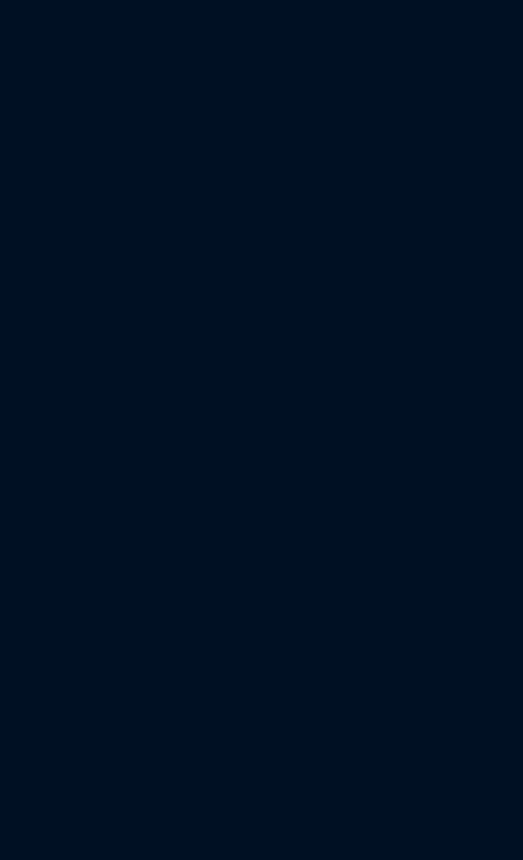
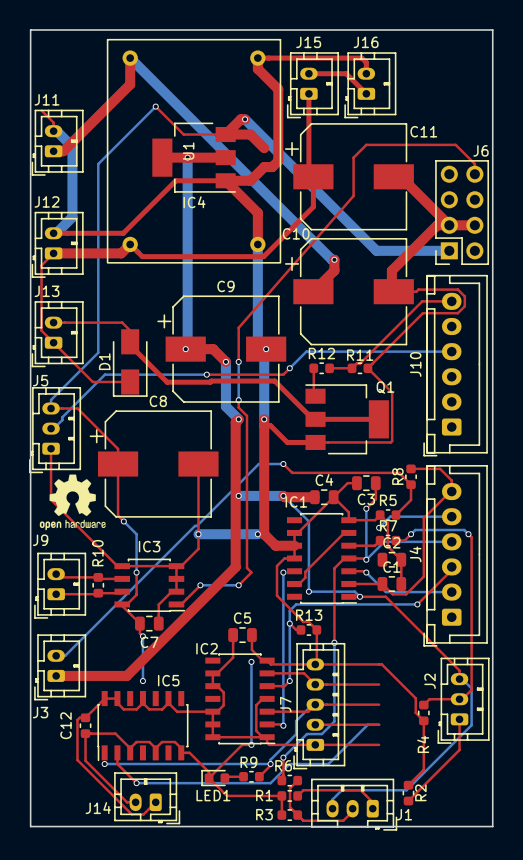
board edge: none -> (30, 29) (492, 29) (492, 826) (30, 826) (30, 29)
top track: none -> (130, 58) (130, 84) (63, 151) (53, 151)
bottom track: none -> (130, 58) (331, 259) (334, 259)
top track: none -> (308, 73) (346, 73) (366, 93)
top track: none -> (366, 73) (366, 62) (361, 58) (257, 58) (257, 68) (278, 89) (278, 161) (272, 167) (264, 167) (250, 180) (225, 180)
J15: none -> (312, 85)
J16: none -> (370, 85)
top track: none -> (308, 93) (308, 172) (313, 176) (313, 206) (263, 256) (142, 256) (130, 244) (121, 253) (53, 253) (41, 265) (41, 330) (92, 382) (130, 382)
top track: none -> (155, 106) (183, 134) (225, 134)
bottom track: none -> (155, 106) (98, 164) (98, 352) (51, 399) (51, 408)
via: none -> (155, 106)
top track: none -> (41, 110) (53, 122) (53, 131)
top track: none -> (245, 119) (240, 119) (225, 134)
bottom track: none -> (245, 119) (376, 250) (449, 250)
via: none -> (245, 119)
bottom track: none -> (53, 131) (56, 131) (72, 146) (72, 217) (56, 233) (53, 233)
top track: none -> (225, 134) (250, 134) (264, 148)
J11: none -> (57, 142)
U1: none -> (194, 151)
top track: none -> (162, 157) (225, 157)
bottom track: none -> (187, 157) (187, 347) (185, 349)
via: none -> (187, 157)
IC4: none -> (194, 157)
top track: none -> (474, 174) (474, 164) (455, 144) (366, 144) (353, 157) (353, 195) (238, 327) (238, 361)
C11: none -> (349, 176)
top track: none -> (393, 176) (400, 176) (449, 225)
top track: none -> (225, 180) (257, 212) (257, 244)
top track: none -> (225, 180) (175, 180) (123, 233) (53, 233)
J6: none -> (462, 212)
top track: none -> (474, 225) (437, 225) (391, 270) (391, 289) (393, 291) (457, 289) (464, 296) (464, 306) (457, 313) (422, 313) (367, 368) (392, 392) (390, 442) (287, 442) (270, 425) (264, 425)
J12: none -> (57, 244)
bottom track: none -> (257, 244) (257, 340) (266, 349) (264, 351) (264, 419)
top track: none -> (334, 259) (334, 270) (313, 291)
via: none -> (334, 259)
C10: none -> (349, 291)
top track: none -> (451, 301) (422, 301) (360, 363) (356, 363) (352, 368) (329, 368)
top track: none -> (53, 322) (122, 322) (130, 330) (130, 345) (167, 382) (274, 381) (313, 419) (378, 419)
J13: none -> (57, 334)
top track: none -> (185, 349) (213, 349) (225, 361)
via: none -> (185, 349)
C9: none -> (221, 349)
via: none -> (266, 349)
bottom track: none -> (451, 351) (306, 351) (289, 368)
bottom track: none -> (225, 361) (225, 406) (238, 419)
via: none -> (225, 361)
bottom track: none -> (238, 361) (238, 400)
via: none -> (238, 361)
D1: none -> (130, 362)
J10: none -> (455, 365)
top track: none -> (289, 368) (283, 374) (206, 374)
via: none -> (289, 368)
top track: none -> (313, 368) (313, 394) (315, 396)
R12: none -> (321, 368)
R11: none -> (359, 368)
bottom track: none -> (206, 374) (104, 374) (62, 417) (62, 420) (53, 428) (51, 428)
via: none -> (206, 374)
top track: none -> (238, 400) (238, 407) (246, 415) (246, 568) (251, 572) (238, 585)
via: none -> (238, 400)
top track: none -> (51, 408) (77, 408) (118, 448) (118, 515) (123, 521)
top track: none -> (238, 419) (235, 422) (235, 567) (126, 675) (56, 675)
via: none -> (238, 419)
top track: none -> (264, 419) (264, 534) (275, 545) (294, 545)
via: none -> (264, 419)
Q1: none -> (347, 419)
J5: none -> (55, 430)
top track: none -> (51, 448) (51, 499) (117, 566) (181, 566) (198, 548) (198, 464)
C8: none -> (154, 464)
top track: none -> (283, 464) (292, 472) (399, 472) (411, 484) (411, 500) (395, 515)
bottom track: none -> (283, 464) (258, 464) (65, 655) (56, 655)
via: none -> (283, 464)
top track: none -> (411, 468) (440, 468) (451, 480) (451, 491) (423, 518) (423, 576) (406, 594) (392, 594) (382, 584) (348, 584)
drawing: none -> [39, 474, 106, 531]
R8: none -> (411, 476)
top track: none -> (356, 483) (347, 483) (297, 532) (294, 532) (294, 558) (284, 558) (277, 565) (277, 595) (303, 621) (308, 621) (316, 629) (315, 664)
C3: none -> (366, 483)
top track: none -> (375, 483) (375, 499) (366, 508)
bottom track: none -> (238, 495) (283, 495) (308, 521) (308, 591) (354, 591) (359, 596)
via: none -> (238, 495)
top track: none -> (283, 495) (314, 497)
via: none -> (283, 495)
C4: none -> (324, 497)
top track: none -> (333, 497) (348, 512) (348, 520) (375, 520) (380, 515) (387, 522) (387, 546) (401, 559) (401, 584)
bottom track: none -> (366, 508) (366, 559) (384, 541) (451, 541)
via: none -> (366, 508)
R5: none -> (388, 515)
bottom track: none -> (451, 516) (390, 516) (379, 527)
bottom track: none -> (123, 521) (136, 534) (136, 572)
via: none -> (123, 521)
via: none -> (379, 527)
top track: none -> (348, 532) (344, 532) (305, 571) (305, 577) (299, 584) (294, 584)
bottom track: none -> (198, 534) (257, 534)
via: none -> (198, 534)
via: none -> (257, 534)
top track: none -> (411, 534) (404, 540) (395, 540)
bottom track: none -> (411, 534) (415, 530) (464, 530) (468, 534)
via: none -> (411, 534)
top track: none -> (468, 534) (471, 537) (471, 689) (462, 699) (429, 699) (423, 705)
via: none -> (468, 534)
top track: none -> (380, 540) (375, 545) (348, 545)
R7: none -> (388, 540)
J4: none -> (455, 555)
IC1: none -> (322, 558)
top track: none -> (366, 559) (344, 558) (334, 568) (334, 642)
via: none -> (366, 559)
C2: none -> (391, 559)
top track: none -> (176, 566) (176, 591) (171, 591) (158, 604) (158, 623)
top track: none -> (451, 566) (451, 570) (417, 604)
top track: none -> (348, 571) (366, 572)
top track: none -> (136, 572) (136, 594) (126, 604) (122, 605) (139, 623) (139, 633) (142, 636)
via: none -> (136, 572)
bottom track: none -> (283, 572) (283, 725)
via: none -> (283, 572)
bottom track: none -> (366, 572) (385, 592) (451, 592)
via: none -> (366, 572)
top track: none -> (56, 574) (59, 577) (122, 578)
C1: none -> (391, 584)
J9: none -> (60, 585)
R10: none -> (98, 585)
IC3: none -> (149, 585)
top track: none -> (200, 585) (181, 604) (176, 604)
bottom track: none -> (200, 585) (238, 585)
via: none -> (200, 585)
via: none -> (238, 585)
top track: none -> (122, 591) (97, 594) (56, 594)
via: none -> (308, 591)
top track: none -> (348, 596) (385, 596) (459, 670) (459, 679)
via: none -> (359, 596)
bottom track: none -> (417, 604) (296, 604) (289, 610) (289, 681)
via: none -> (417, 604)
C7: none -> (149, 623)
top track: none -> (289, 623) (296, 629) (301, 629)
via: none -> (289, 623)
R13: none -> (308, 629)
top track: none -> (233, 635) (233, 657) (217, 673) (212, 673) (212, 686) (217, 686) (223, 692) (223, 705) (217, 711) (177, 711) (168, 703)
C5: none -> (242, 635)
top track: none -> (251, 635) (251, 649) (262, 660) (267, 660) (270, 664) (381, 664) (415, 698) (415, 712) (423, 720) (423, 769) (408, 785)
bottom track: none -> (142, 636) (142, 681)
via: none -> (142, 636)
bottom track: none -> (334, 642) (334, 721) (321, 734) (306, 734) (283, 757)
via: none -> (334, 642)
bottom track: none -> (251, 661) (251, 744)
via: none -> (251, 661)
J3: none -> (60, 667)
top track: none -> (267, 673) (304, 673) (315, 684) (379, 684)
bottom track: none -> (459, 679) (462, 679) (471, 688) (471, 725) (406, 790) (341, 790) (332, 799) (332, 802)
via: none -> (142, 681)
top track: none -> (289, 681) (283, 687) (267, 686)
via: none -> (289, 681)
top track: none -> (104, 698) (117, 698) (117, 703) (123, 709) (136, 709) (142, 703) (149, 709) (162, 709) (168, 703)
top track: none -> (104, 698) (85, 717) (79, 717) (77, 720) (77, 760) (131, 814) (143, 814) (155, 802)
IC2: none -> (240, 698)
top track: none -> (267, 698) (262, 698) (256, 705) (256, 730) (262, 737)
J2: none -> (463, 700)
bottom track: none -> (315, 704) (312, 704) (296, 721) (296, 734) (270, 759) (270, 764) (104, 764)
top track: none -> (379, 704) (315, 704) (308, 711) (267, 711)
J7: none -> (319, 706)
top track: none -> (212, 711) (212, 737) (267, 737) (269, 744) (379, 744)
R4: none -> (423, 712)
top track: none -> (459, 719) (459, 749) (408, 801)
top track: none -> (267, 724) (283, 725)
top track: none -> (315, 724) (379, 724)
bottom track: none -> (379, 724) (367, 724) (328, 764) (289, 764) (270, 783) (136, 783)
C12: none -> (85, 725)
via: none -> (283, 725)
IC5: none -> (142, 726)
top track: none -> (251, 744) (242, 744) (209, 778)
via: none -> (251, 744)
top track: none -> (130, 748) (115, 733) (85, 733) (85, 760) (127, 802) (135, 802)
top track: none -> (130, 748) (136, 742) (149, 742) (155, 748)
top track: none -> (155, 748) (162, 742) (174, 742) (181, 748) (181, 752) (189, 752) (209, 772) (209, 778)
top track: none -> (117, 752) (117, 764) (136, 783)
top track: none -> (283, 757) (281, 776)
via: none -> (283, 757)
via: none -> (104, 764)
top track: none -> (270, 764) (259, 776)
via: none -> (270, 764)
top track: none -> (243, 776) (224, 778)
R9: none -> (251, 776)
top track: none -> (209, 778) (226, 795) (281, 795) (281, 815)
LED1: none -> (215, 778)
R6: none -> (289, 780)
top track: none -> (297, 780) (290, 788) (290, 807) (303, 820) (343, 820) (352, 811) (352, 808)
via: none -> (136, 783)
R2: none -> (408, 793)
R1: none -> (289, 795)
top track: none -> (297, 795) (303, 790) (360, 790) (372, 802)
J14: none -> (147, 798)
J1: none -> (354, 804)
R3: none -> (289, 815)

